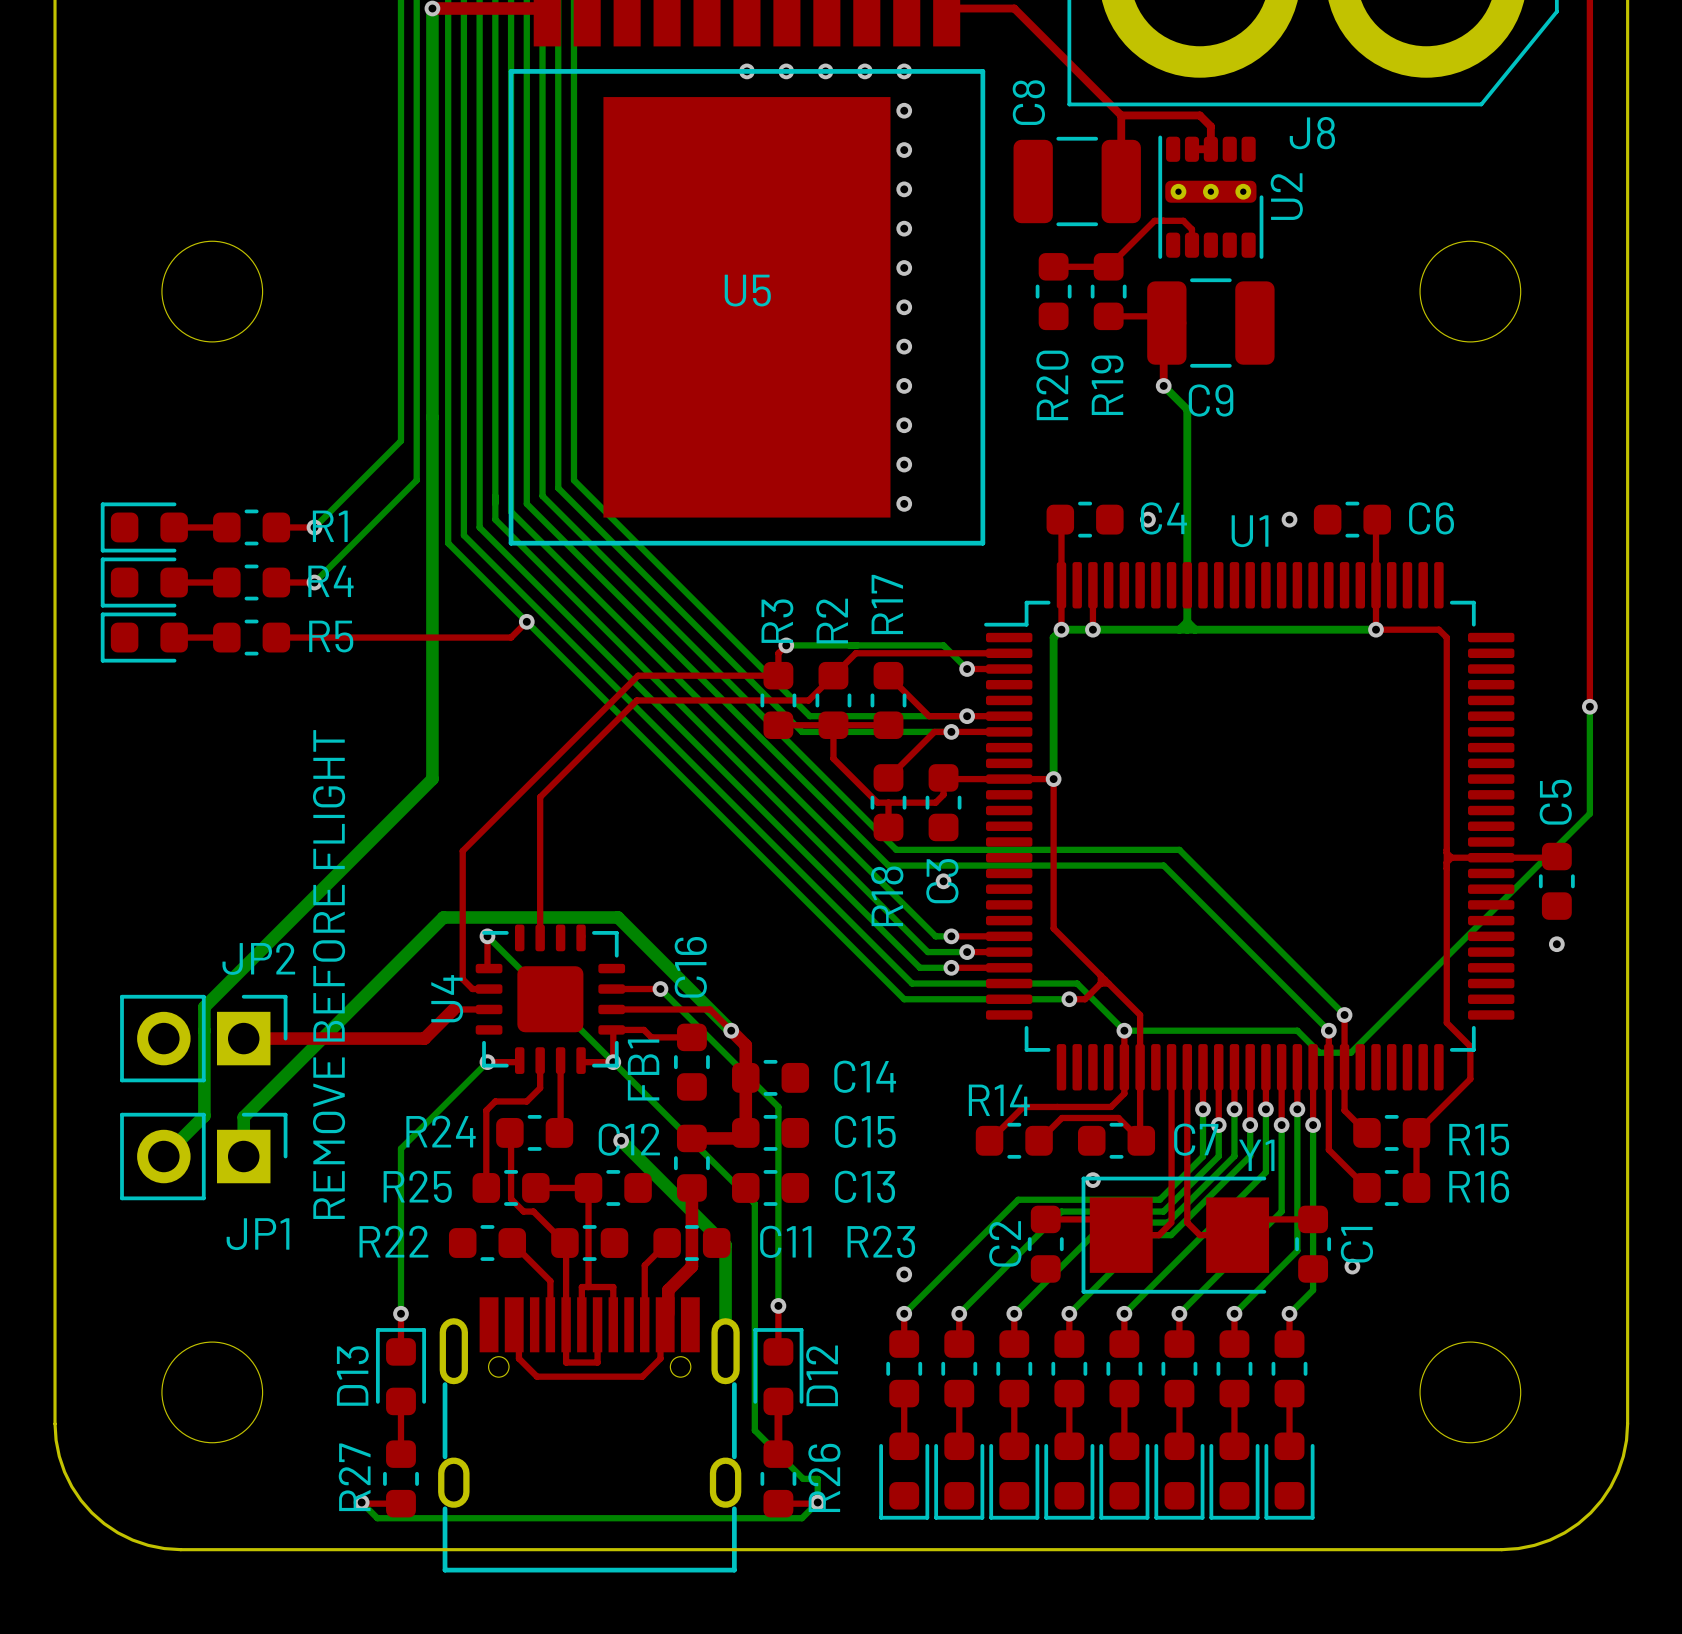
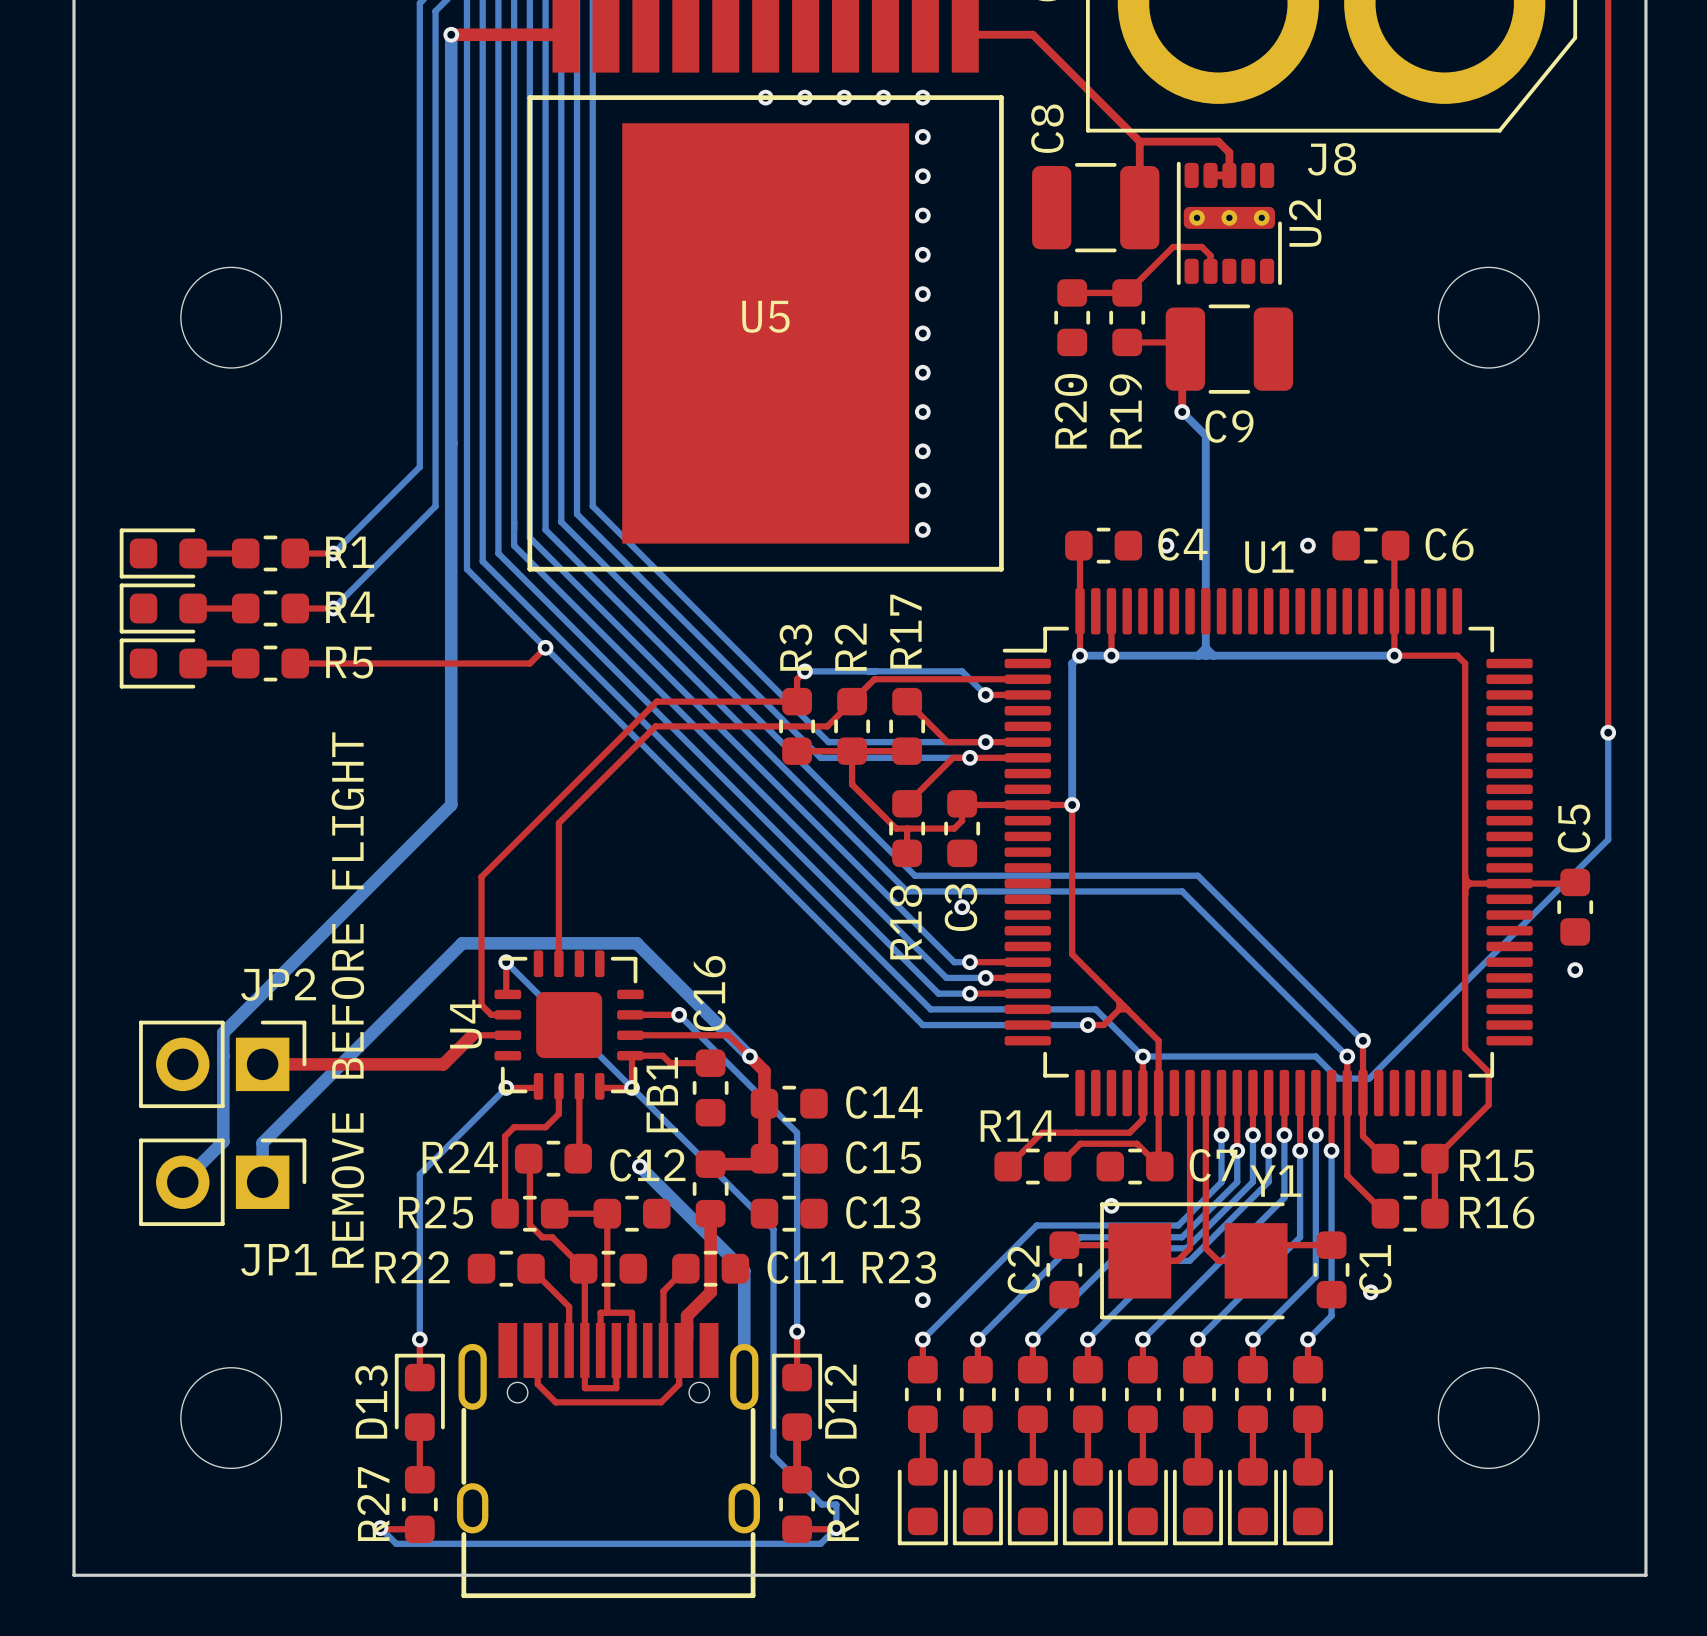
board edge: (55, 1423) (59, 1456) (64, 1472) (81, 1500) (91, 1512) (117, 1532) (132, 1540) (148, 1545) (180, 1549) -> (73, 1449) (73, 1575) (199, 1575)
board edge: (1627, 1423) (1623, 1456) (1618, 1472) (1601, 1500) (1590, 1512) (1564, 1532) (1549, 1540) (1534, 1545) (1501, 1549) -> (1645, 1449) (1645, 1575) (1520, 1575)

